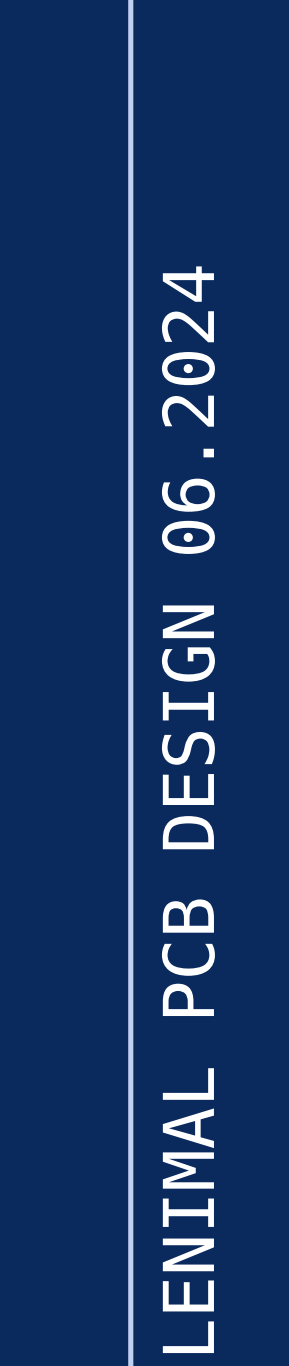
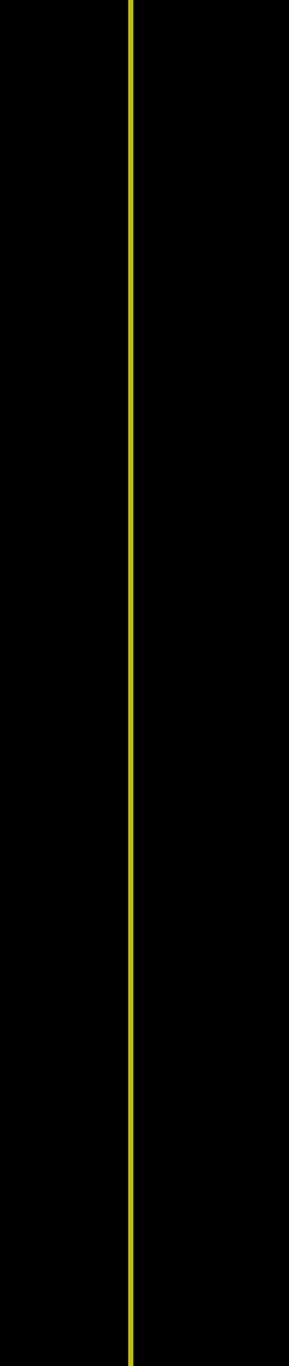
text: LENIMAL PCB DESIGN 06.2024 (188, 809) -> none

